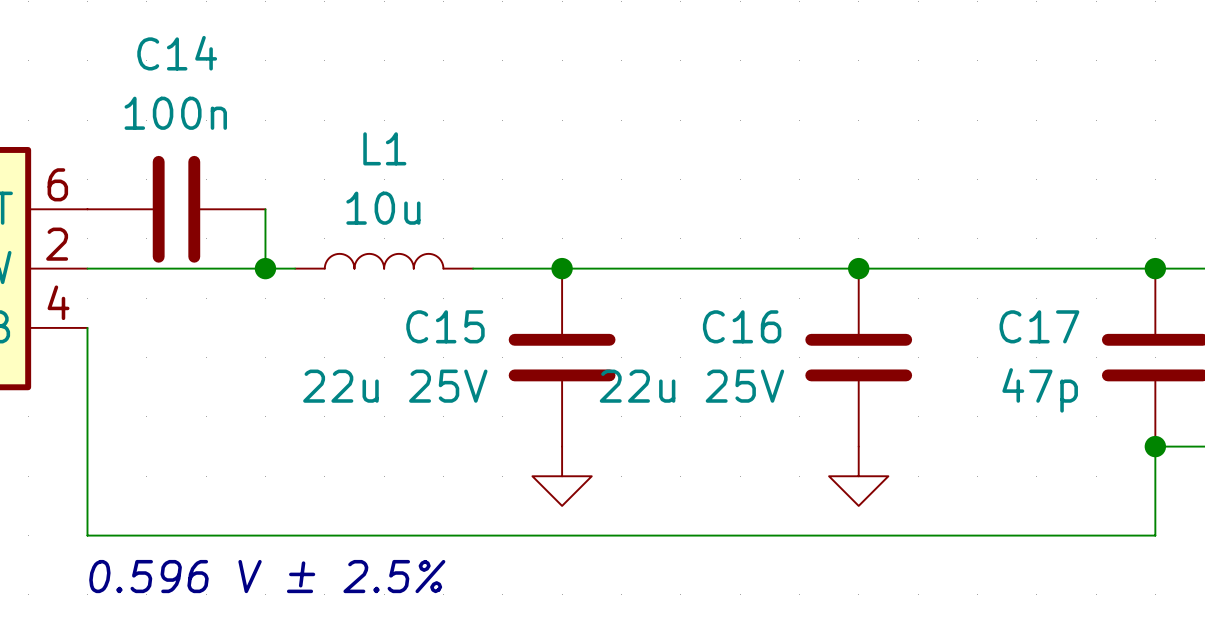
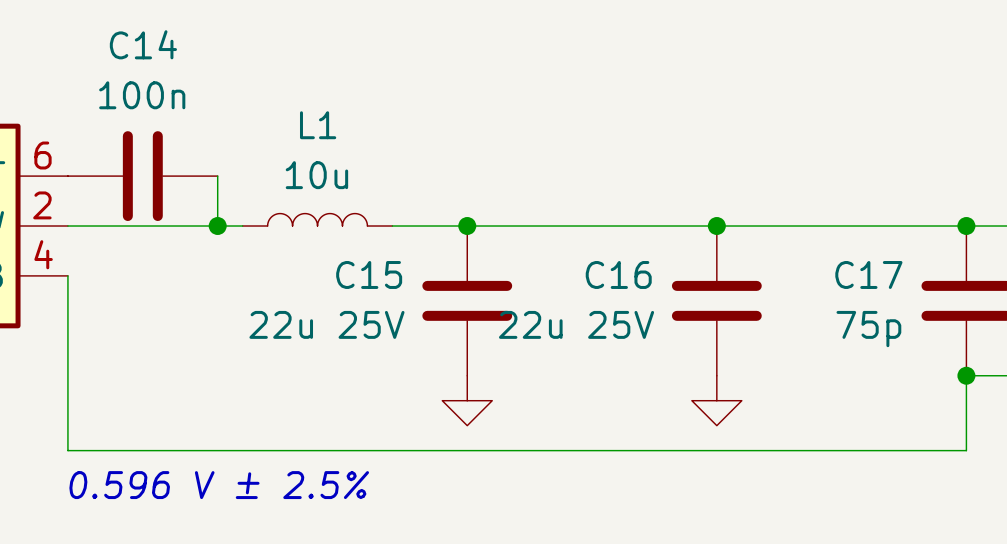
C17 value: 47p (1040, 390) -> 75p (868, 329)

